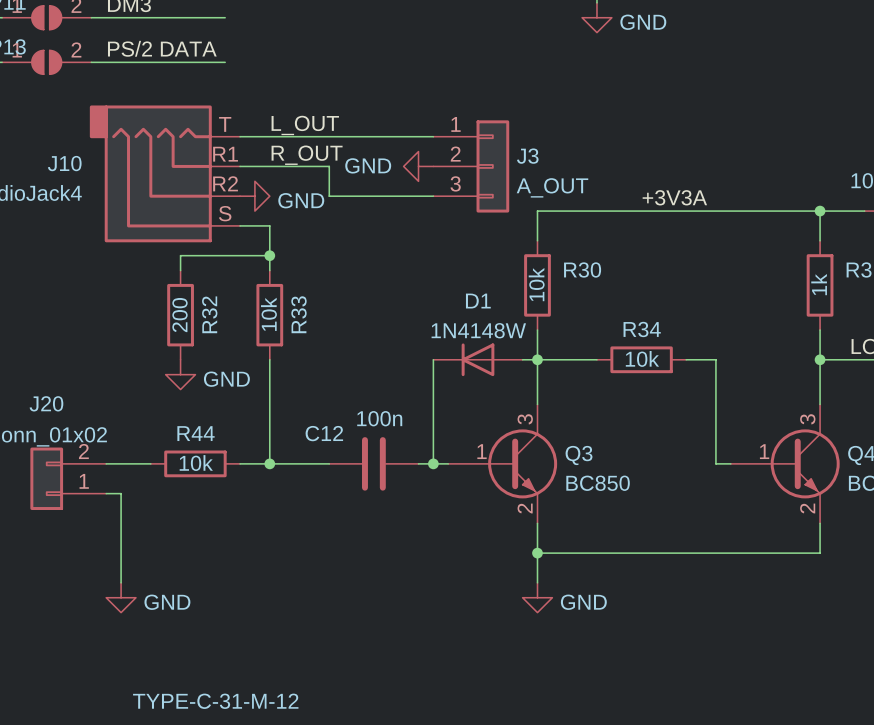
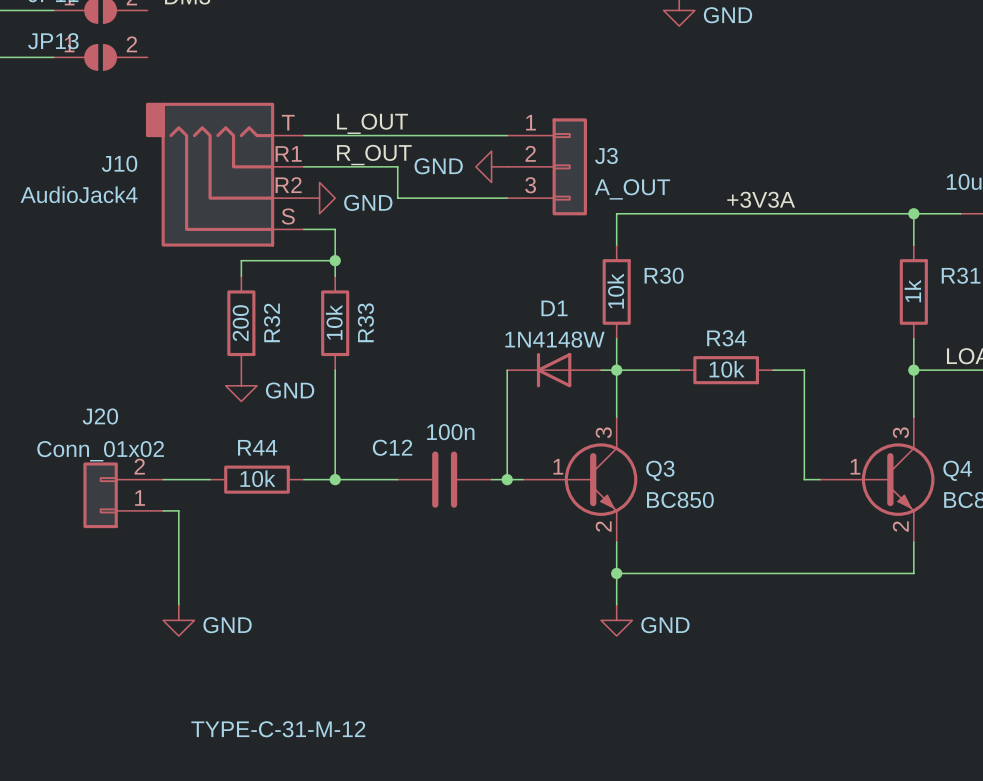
wire: (91, 17) (225, 17) -> none
label: PS/2 DATA (162, 48) -> none
wire: (91, 62) (225, 62) -> none

